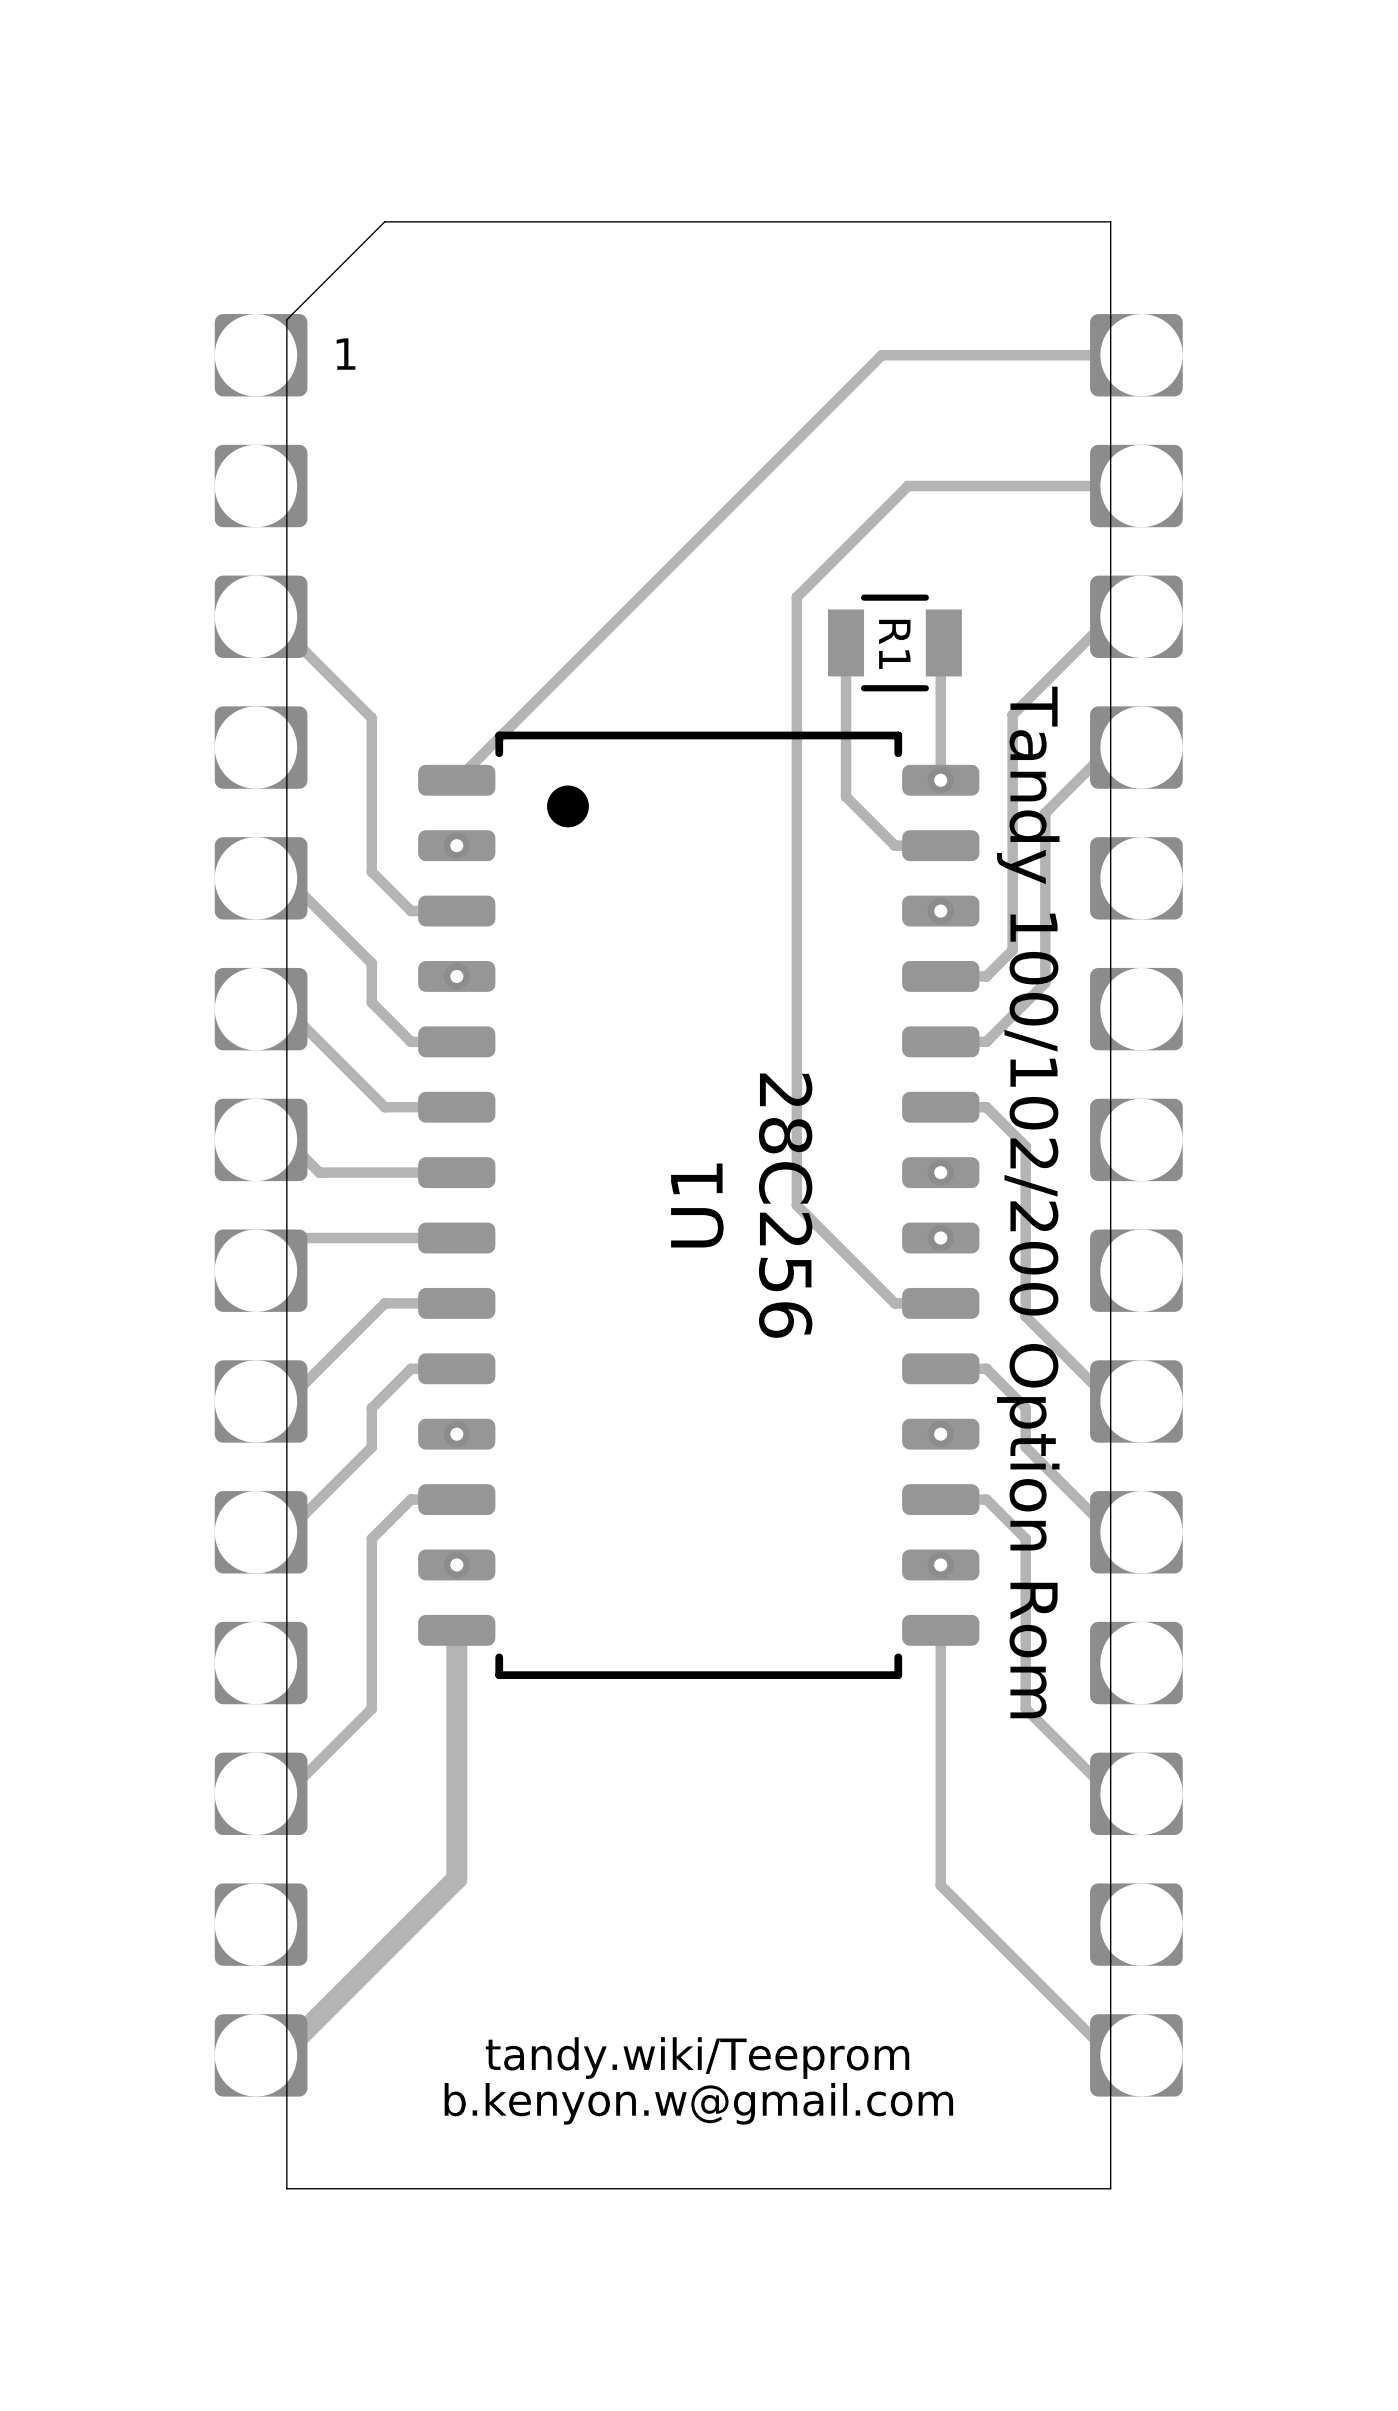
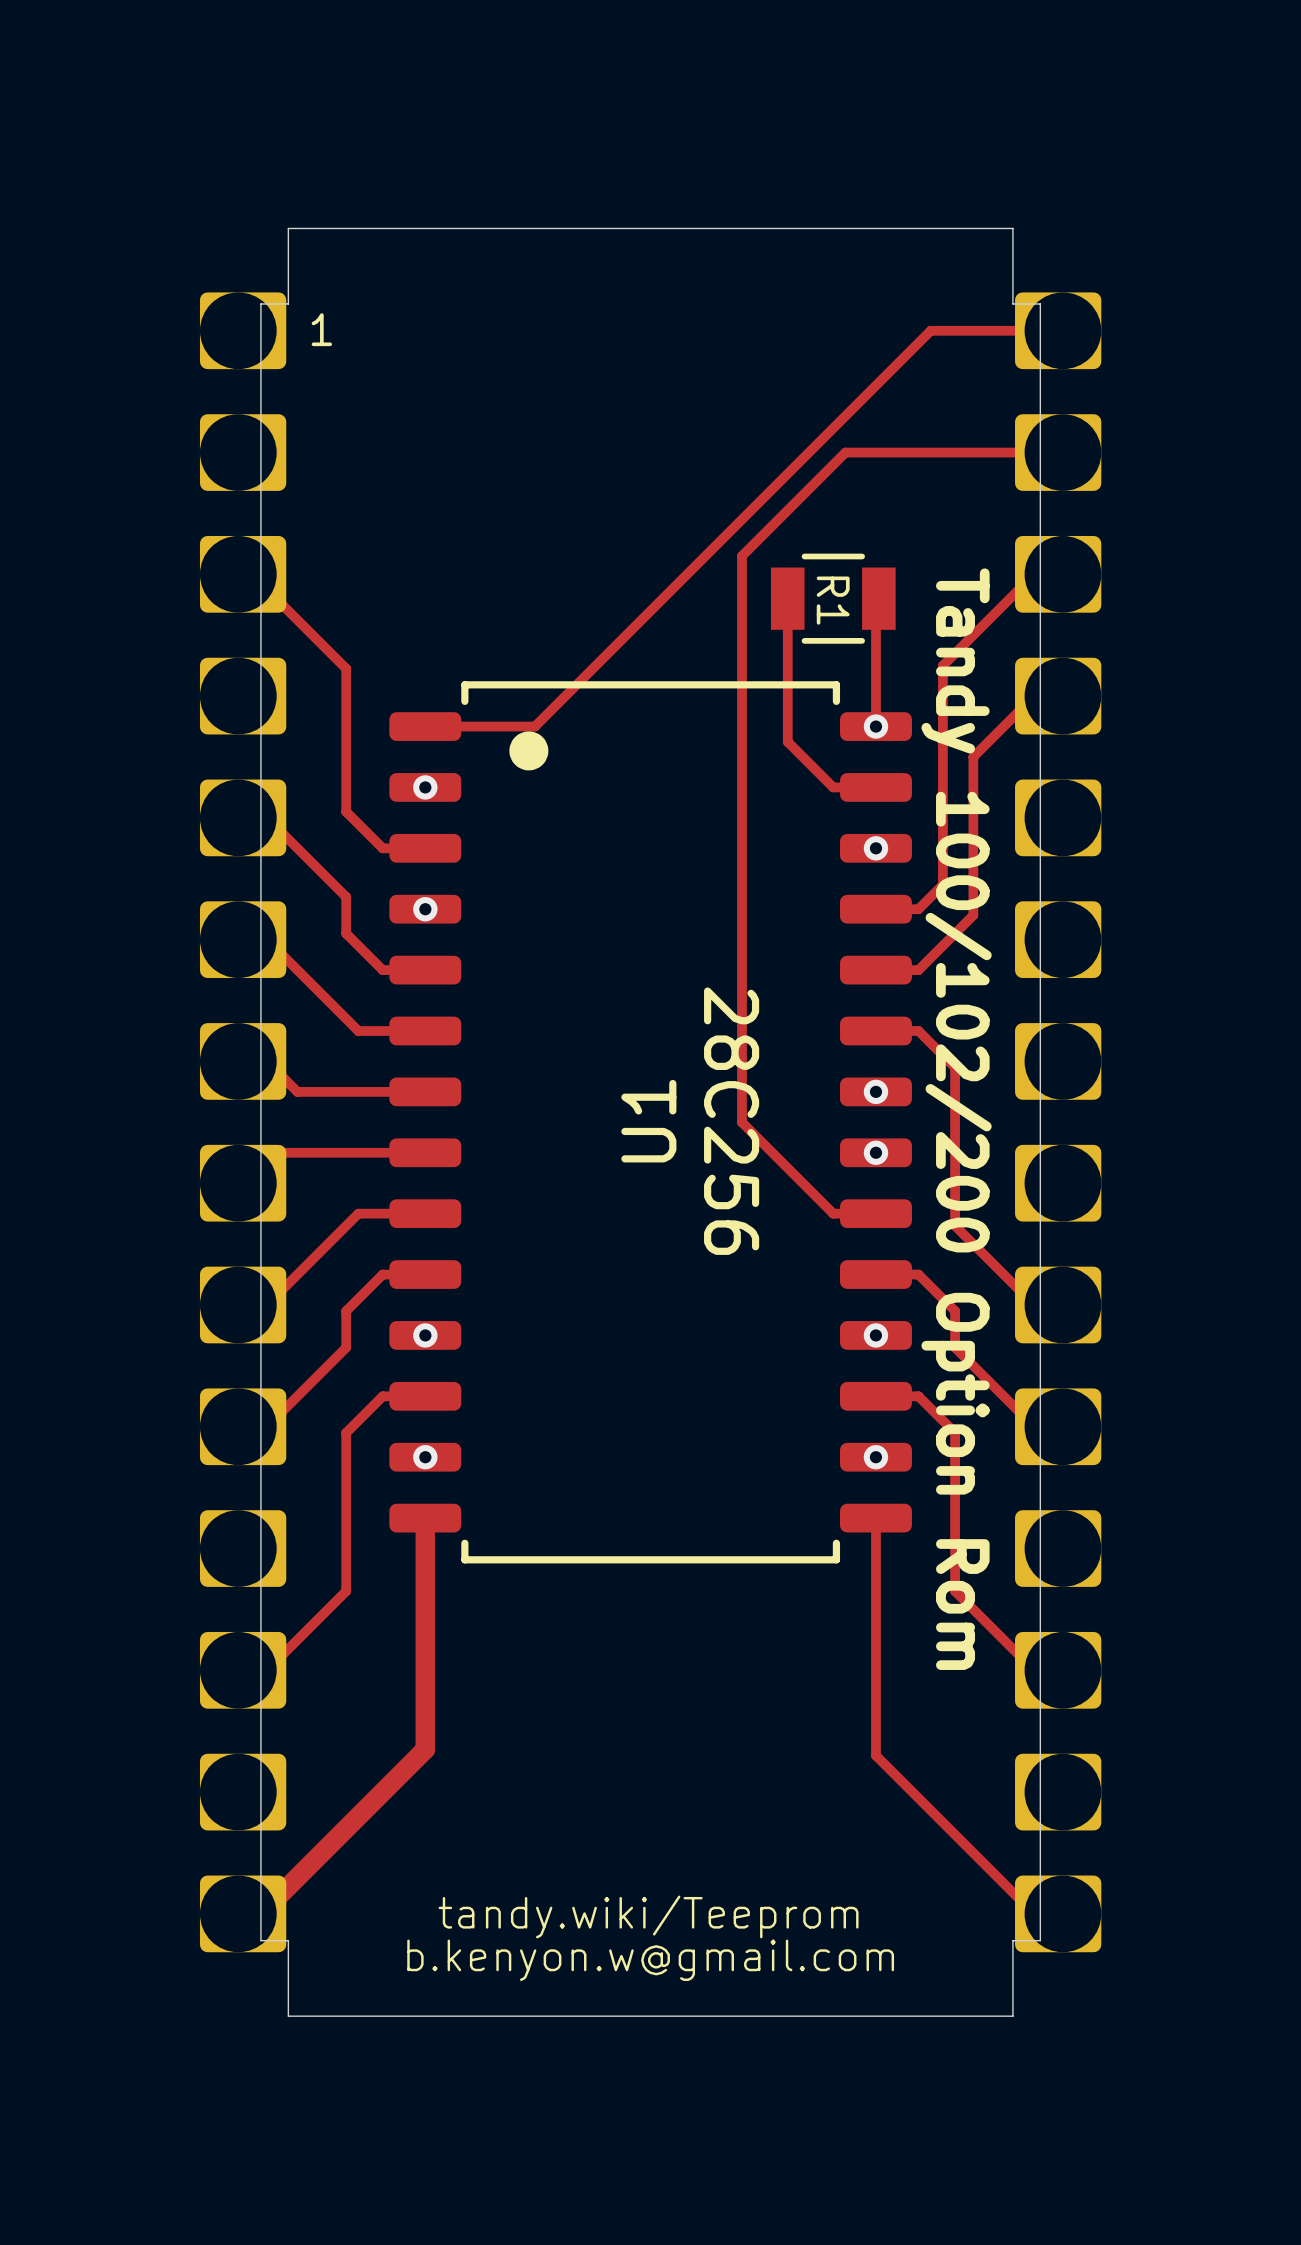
board edge: (384, 221) (1110, 221) (1110, 2188) (286, 2188) (286, 319) (384, 221) -> (288, 228) (288, 303) (260, 303) (260, 1940) (288, 1940) (288, 2016) (1012, 2016) (1012, 1940) (1040, 1940) (1040, 303) (1012, 303) (1012, 228) (288, 228)
track: (999, 355) (881, 355) (456, 780) -> (930, 330) (534, 726) (425, 726)

